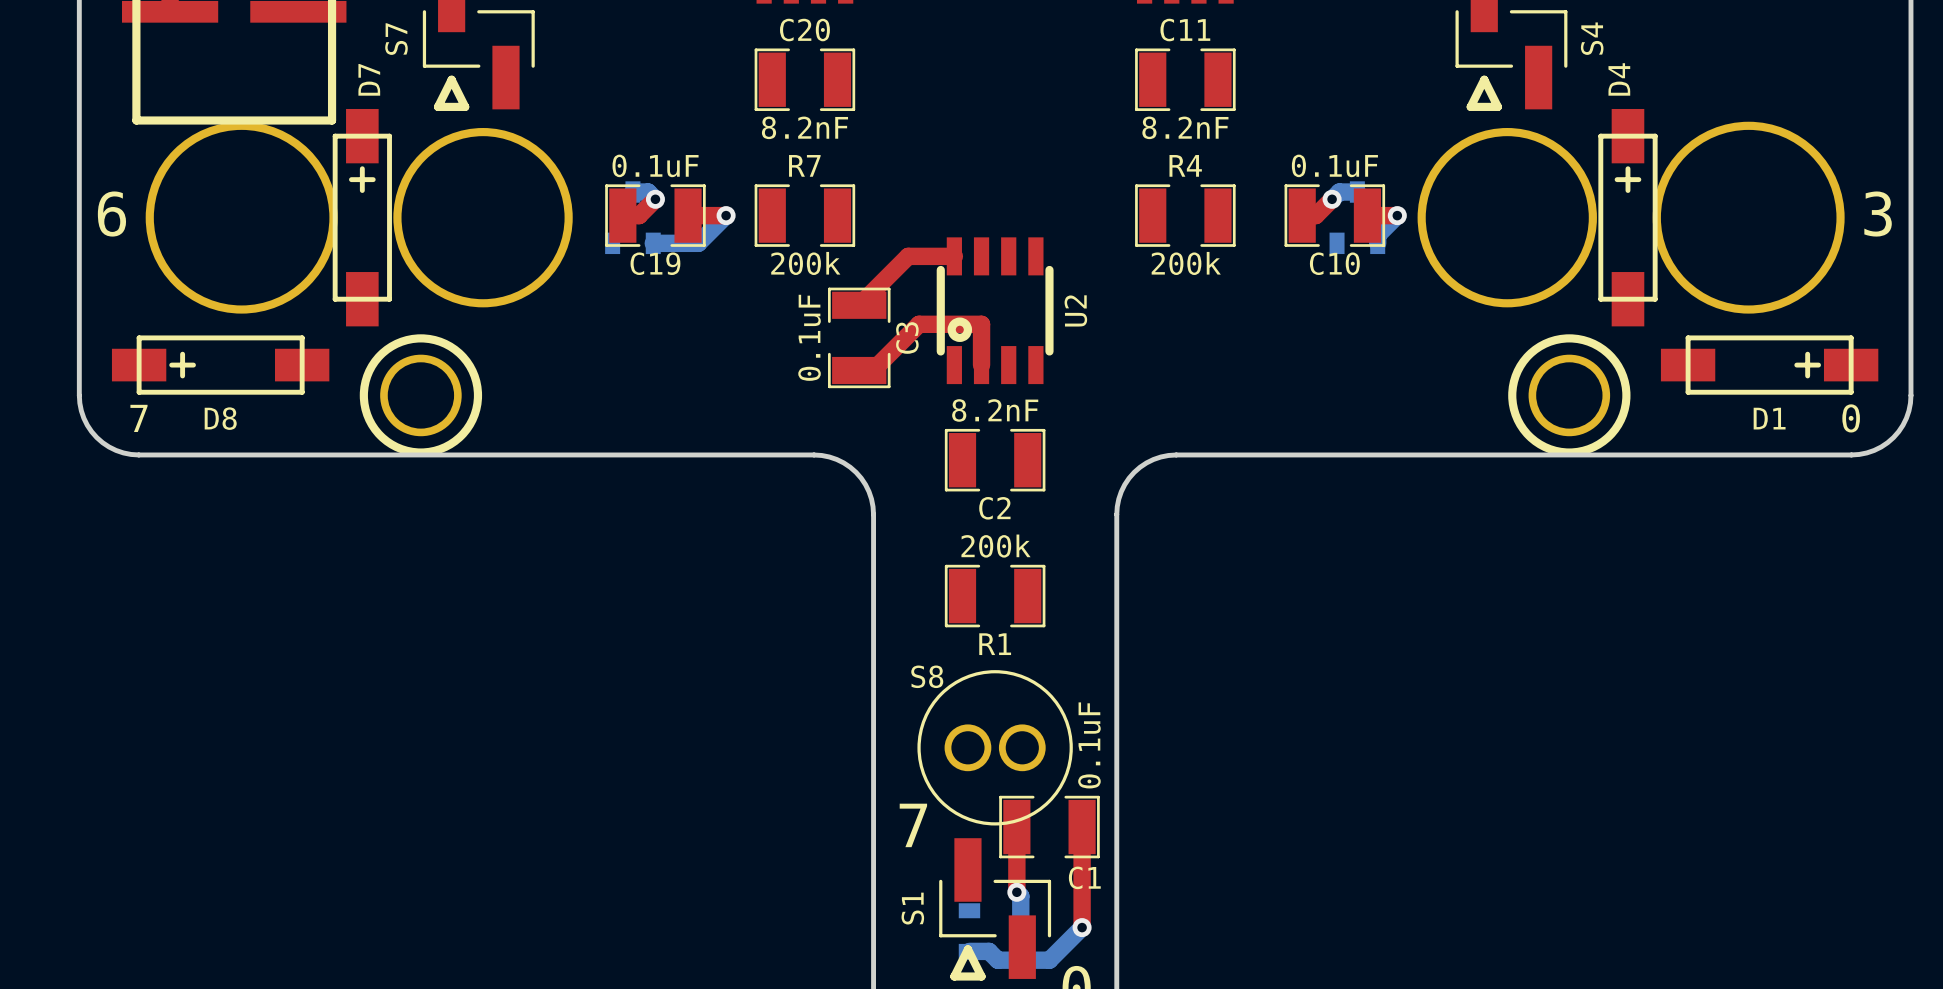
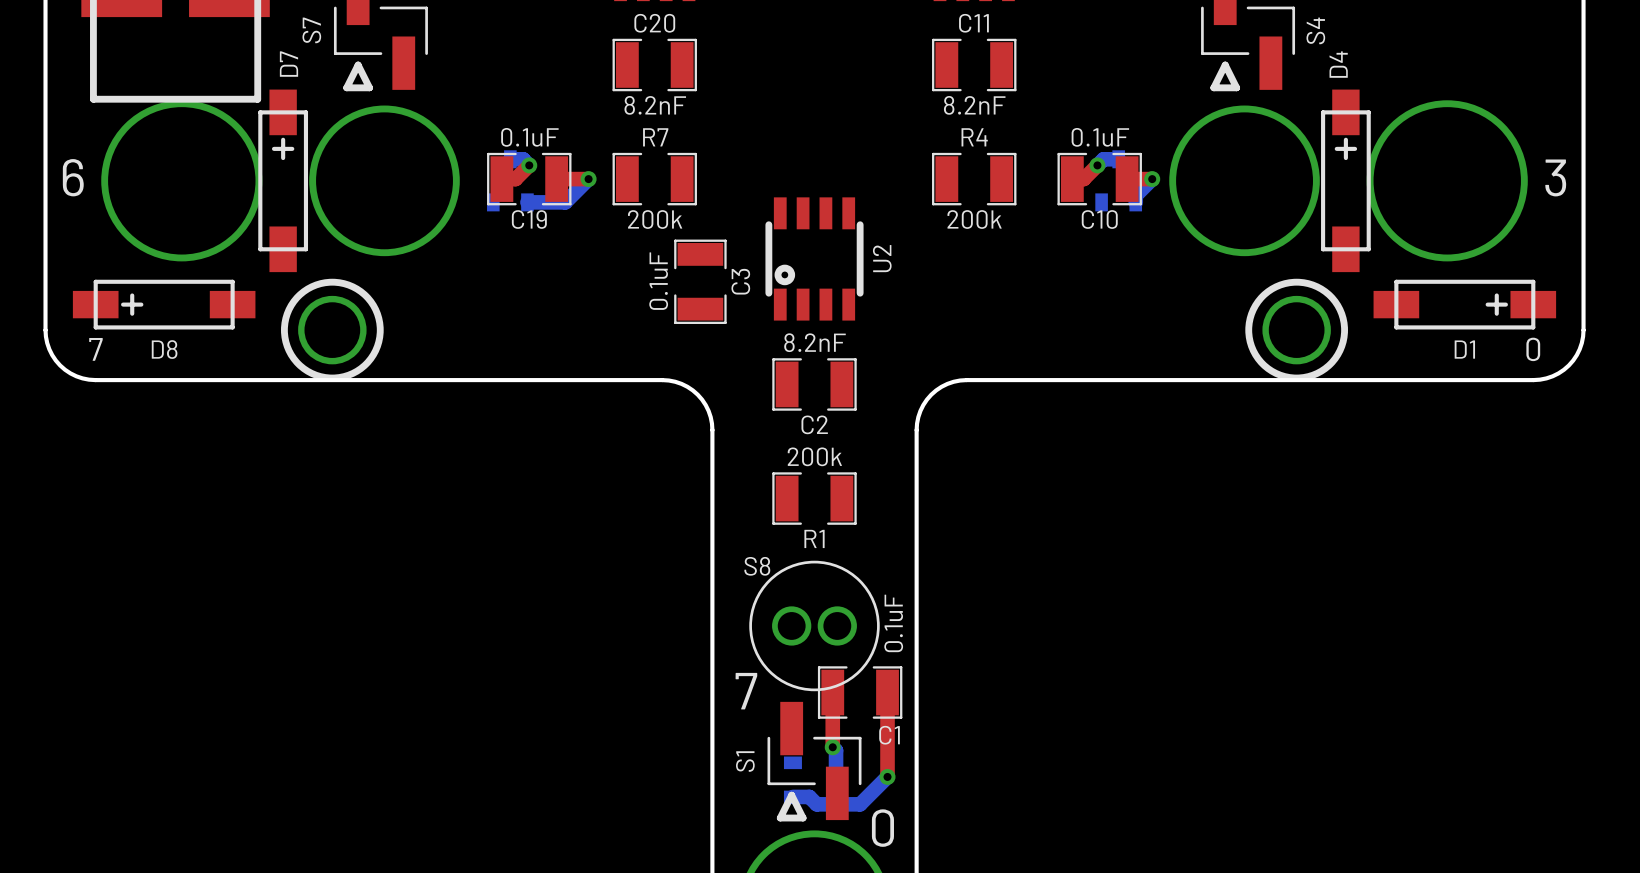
top track: (954, 256) (908, 256) (859, 305) -> none
top track: (981, 365) (981, 324) (919, 324) (872, 370) (859, 370) -> none

